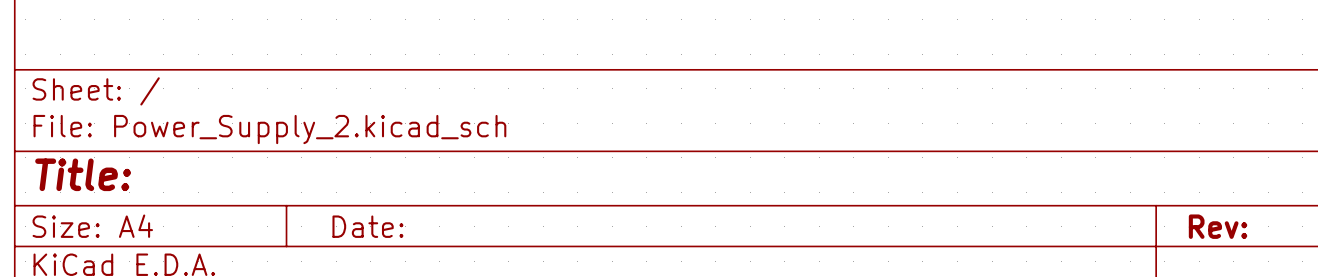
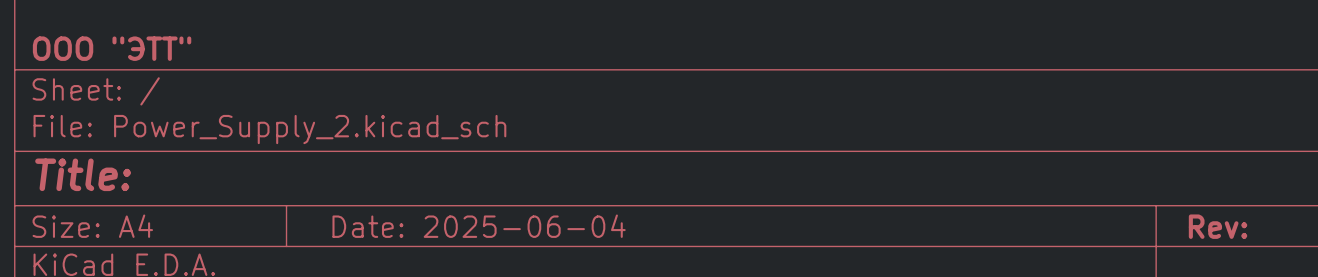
title block: none -> ООО "ЭТТ" (112, 48)
title block: Date: (367, 226) -> Date: 2025-06-04 (479, 226)

